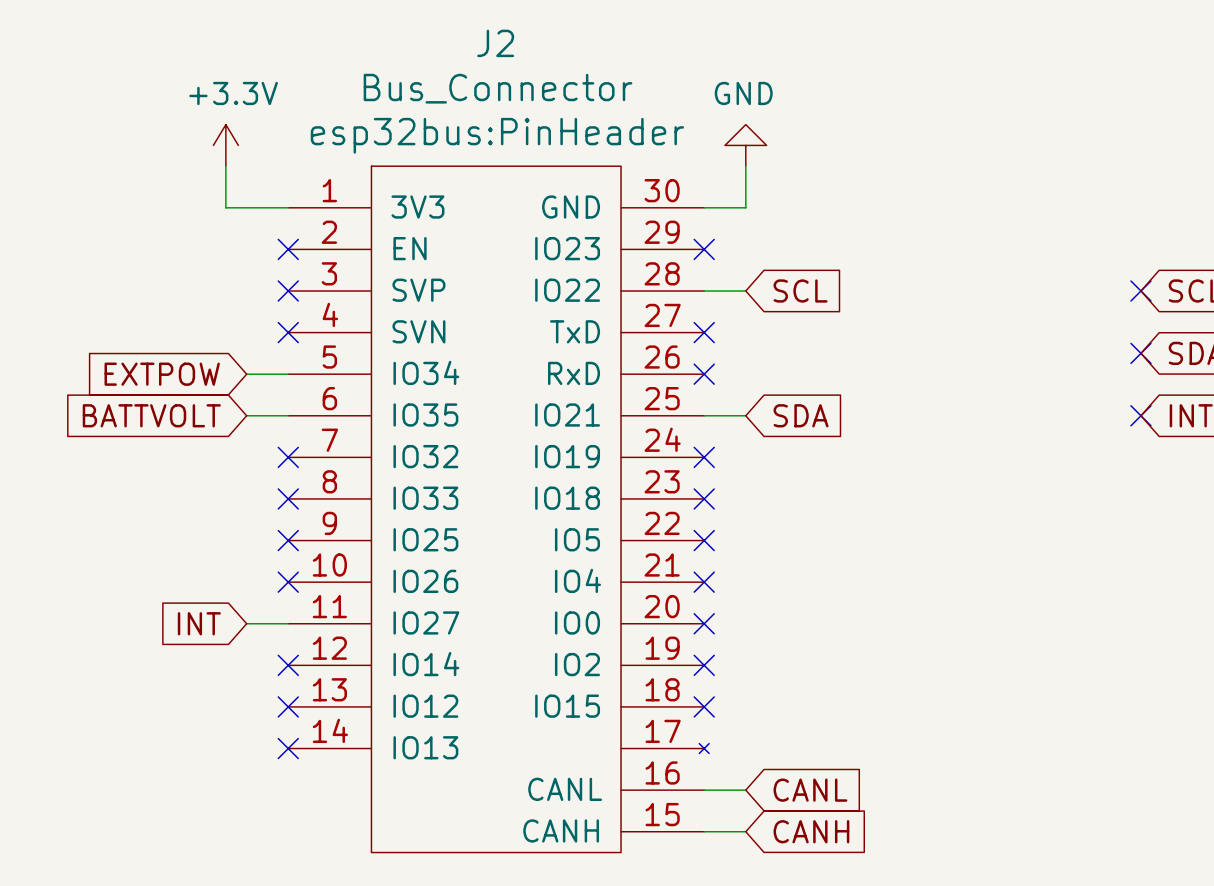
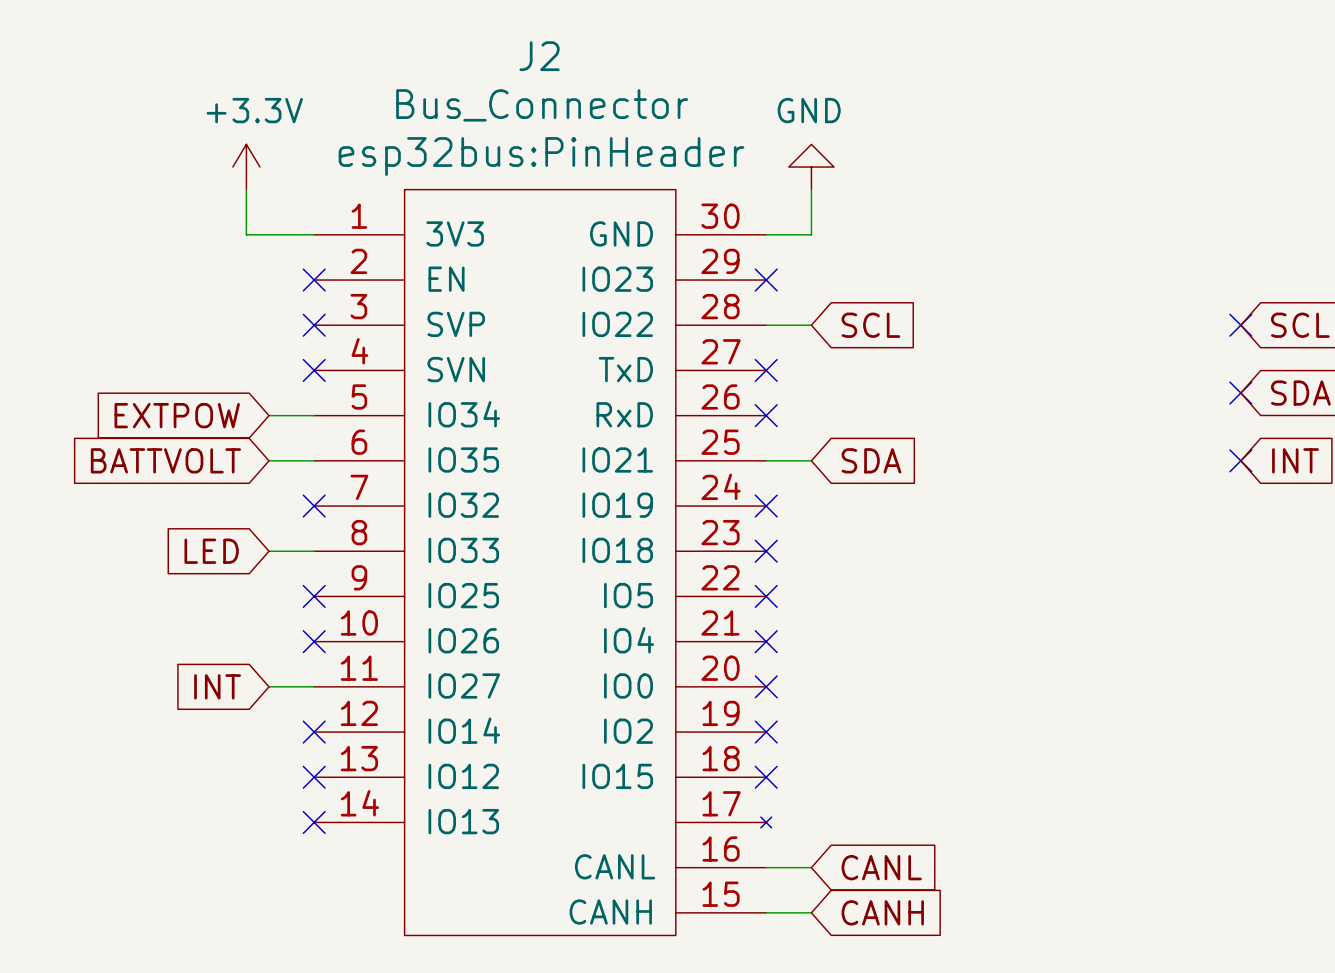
global label: none -> LED (211, 551)
wire: none -> (269, 551) (314, 551)
no-connect mark: (288, 498) -> none

